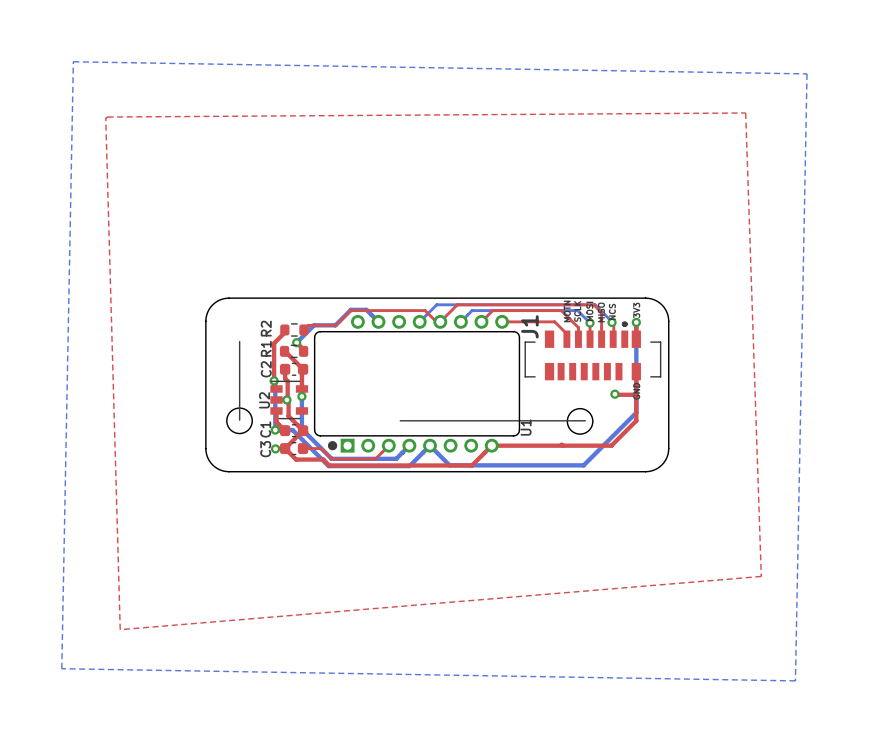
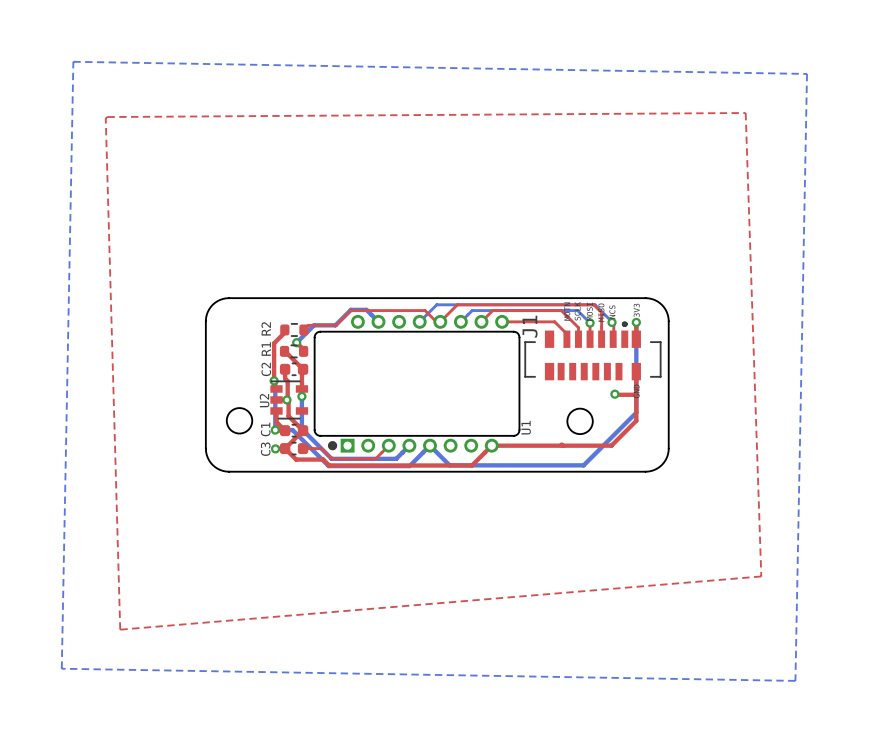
line: (239, 341) (239, 420) -> none
line: (400, 420) (585, 420) -> none

